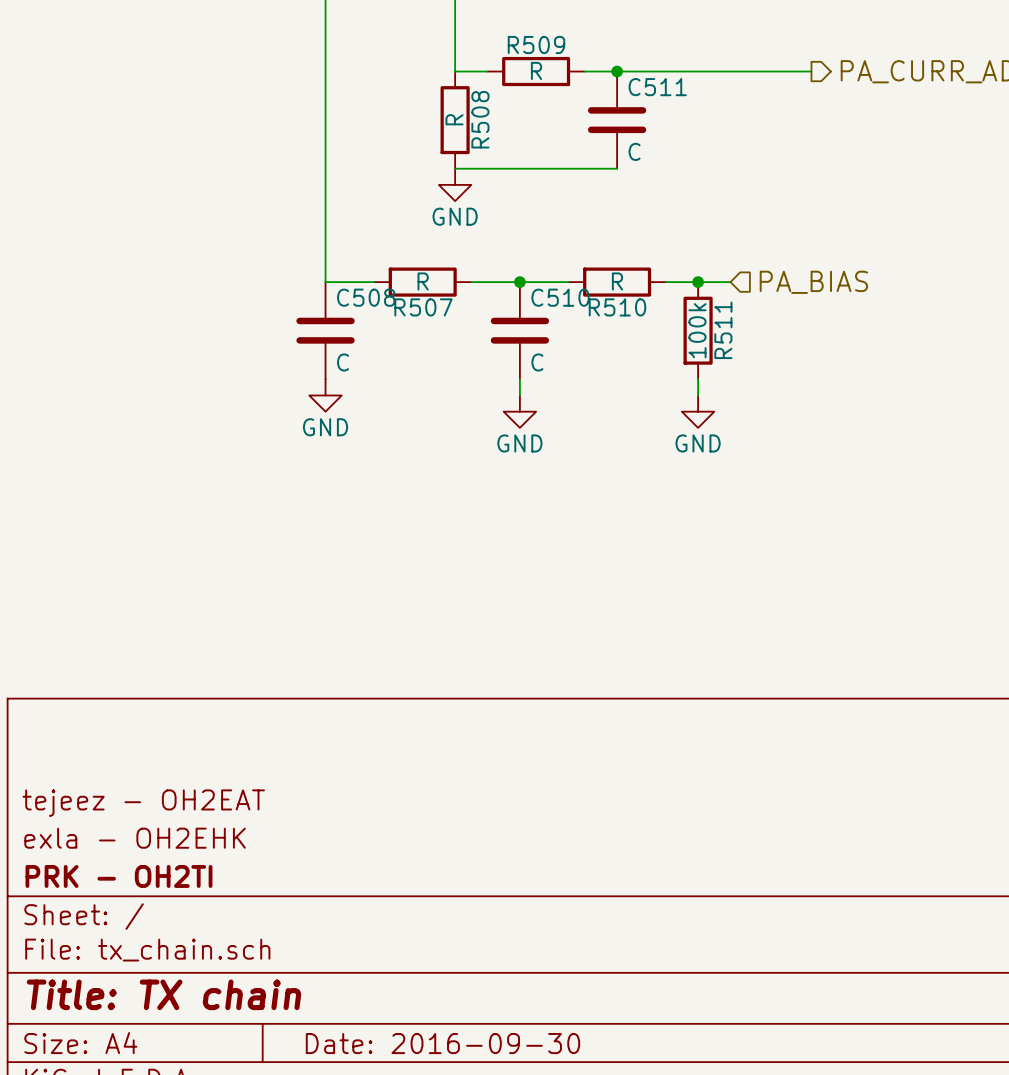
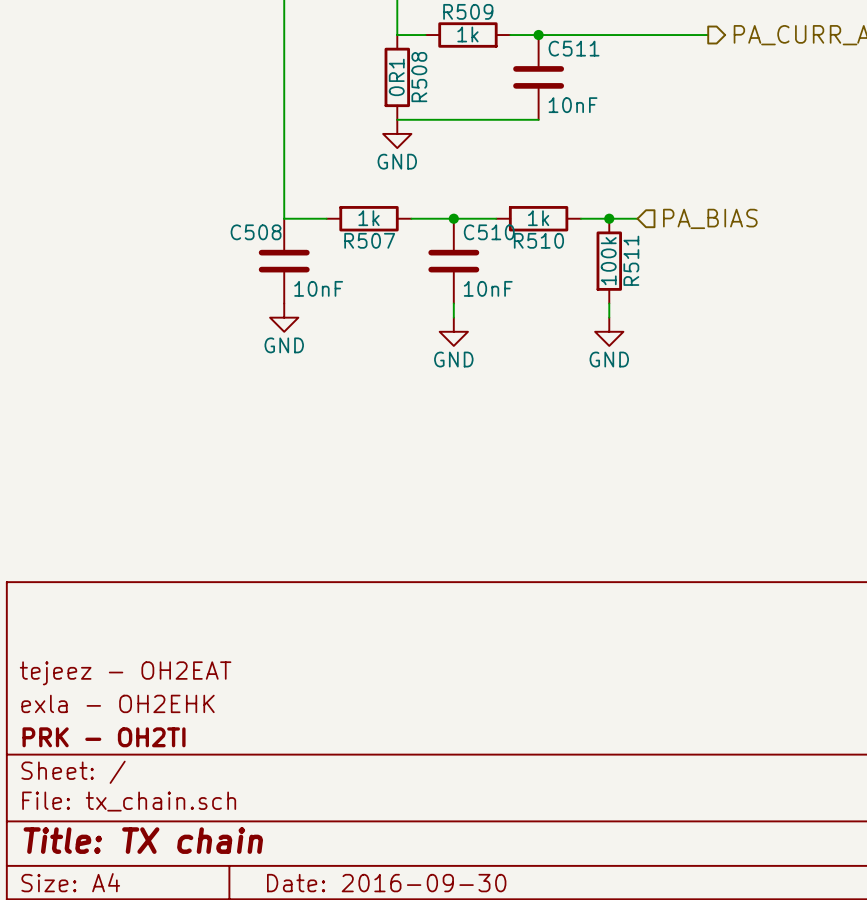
R509 value: R (536, 70) -> 1k (467, 34)
R508 value: R (454, 119) -> 0R1 (396, 77)
C511 value: C (634, 151) -> 10nF (573, 105)
R507 value: R (423, 281) -> 1k (369, 218)
R510 value: R (617, 281) -> 1k (538, 218)
C508 name position: C508 (366, 297) -> C508 (256, 232)
C508 value: C (343, 362) -> 10nF (318, 288)
C510 value: C (537, 362) -> 10nF (488, 288)

